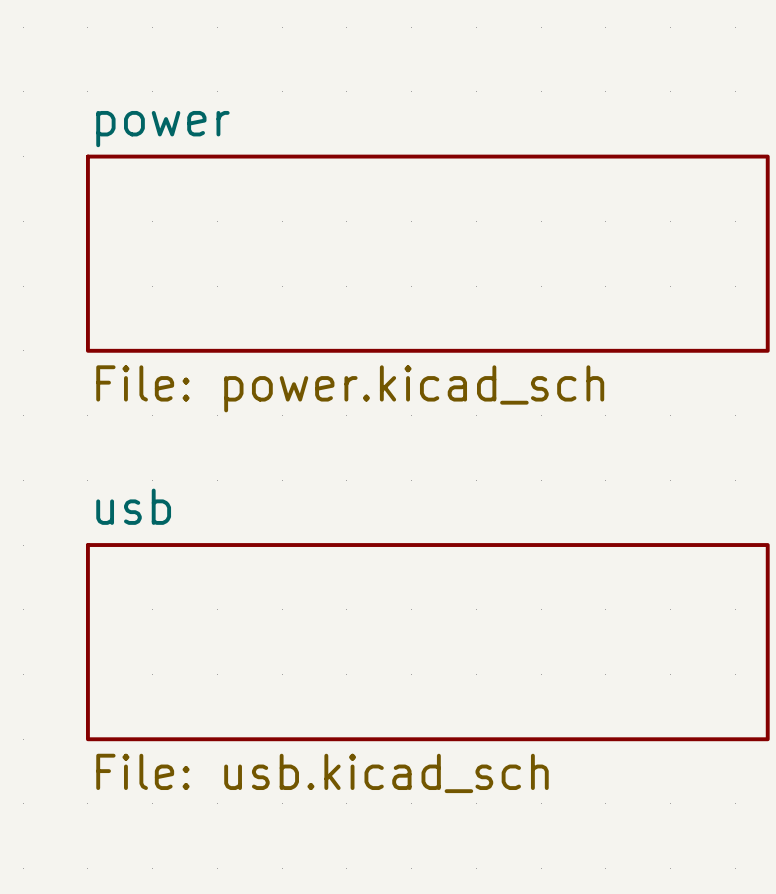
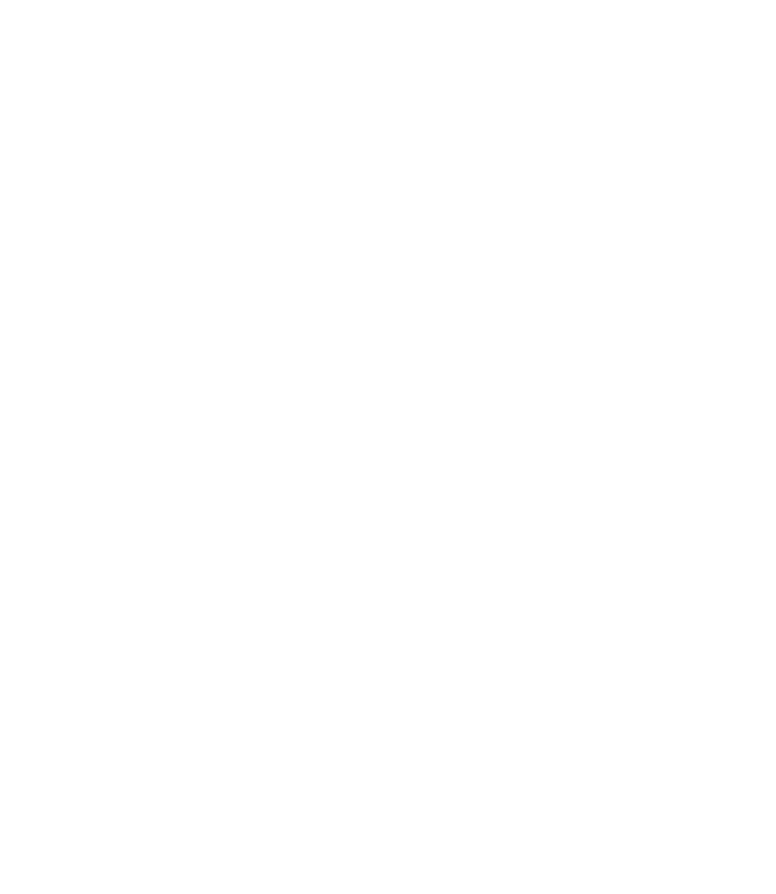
sheet power: File: power.kicad_sch (427, 253) -> none
sheet usb: File: usb.kicad_sch (427, 642) -> none

